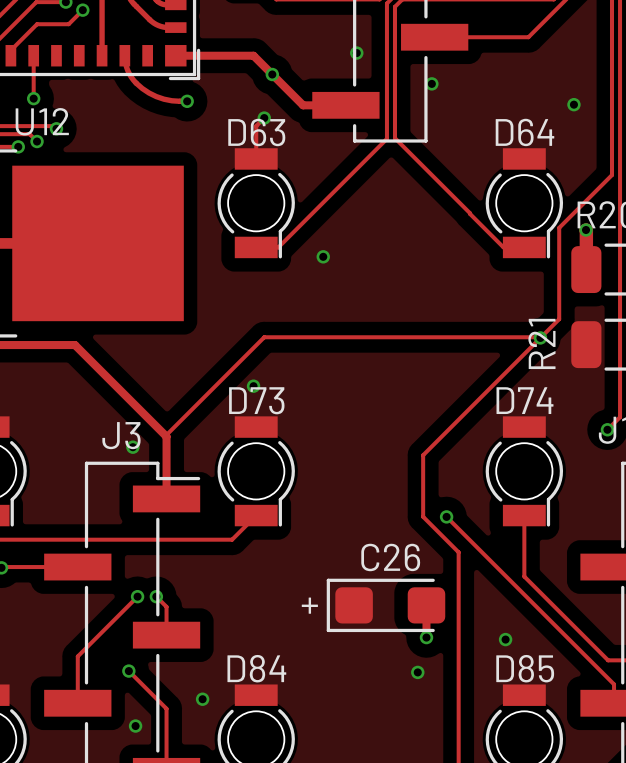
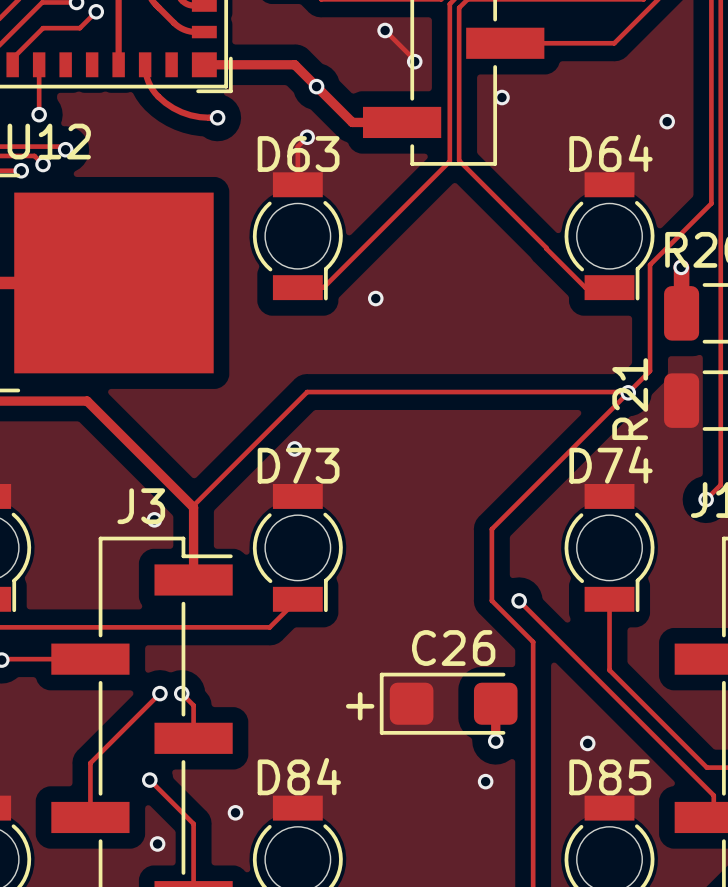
track: none -> (385, 30) (414, 61)
via: none -> (385, 30)

